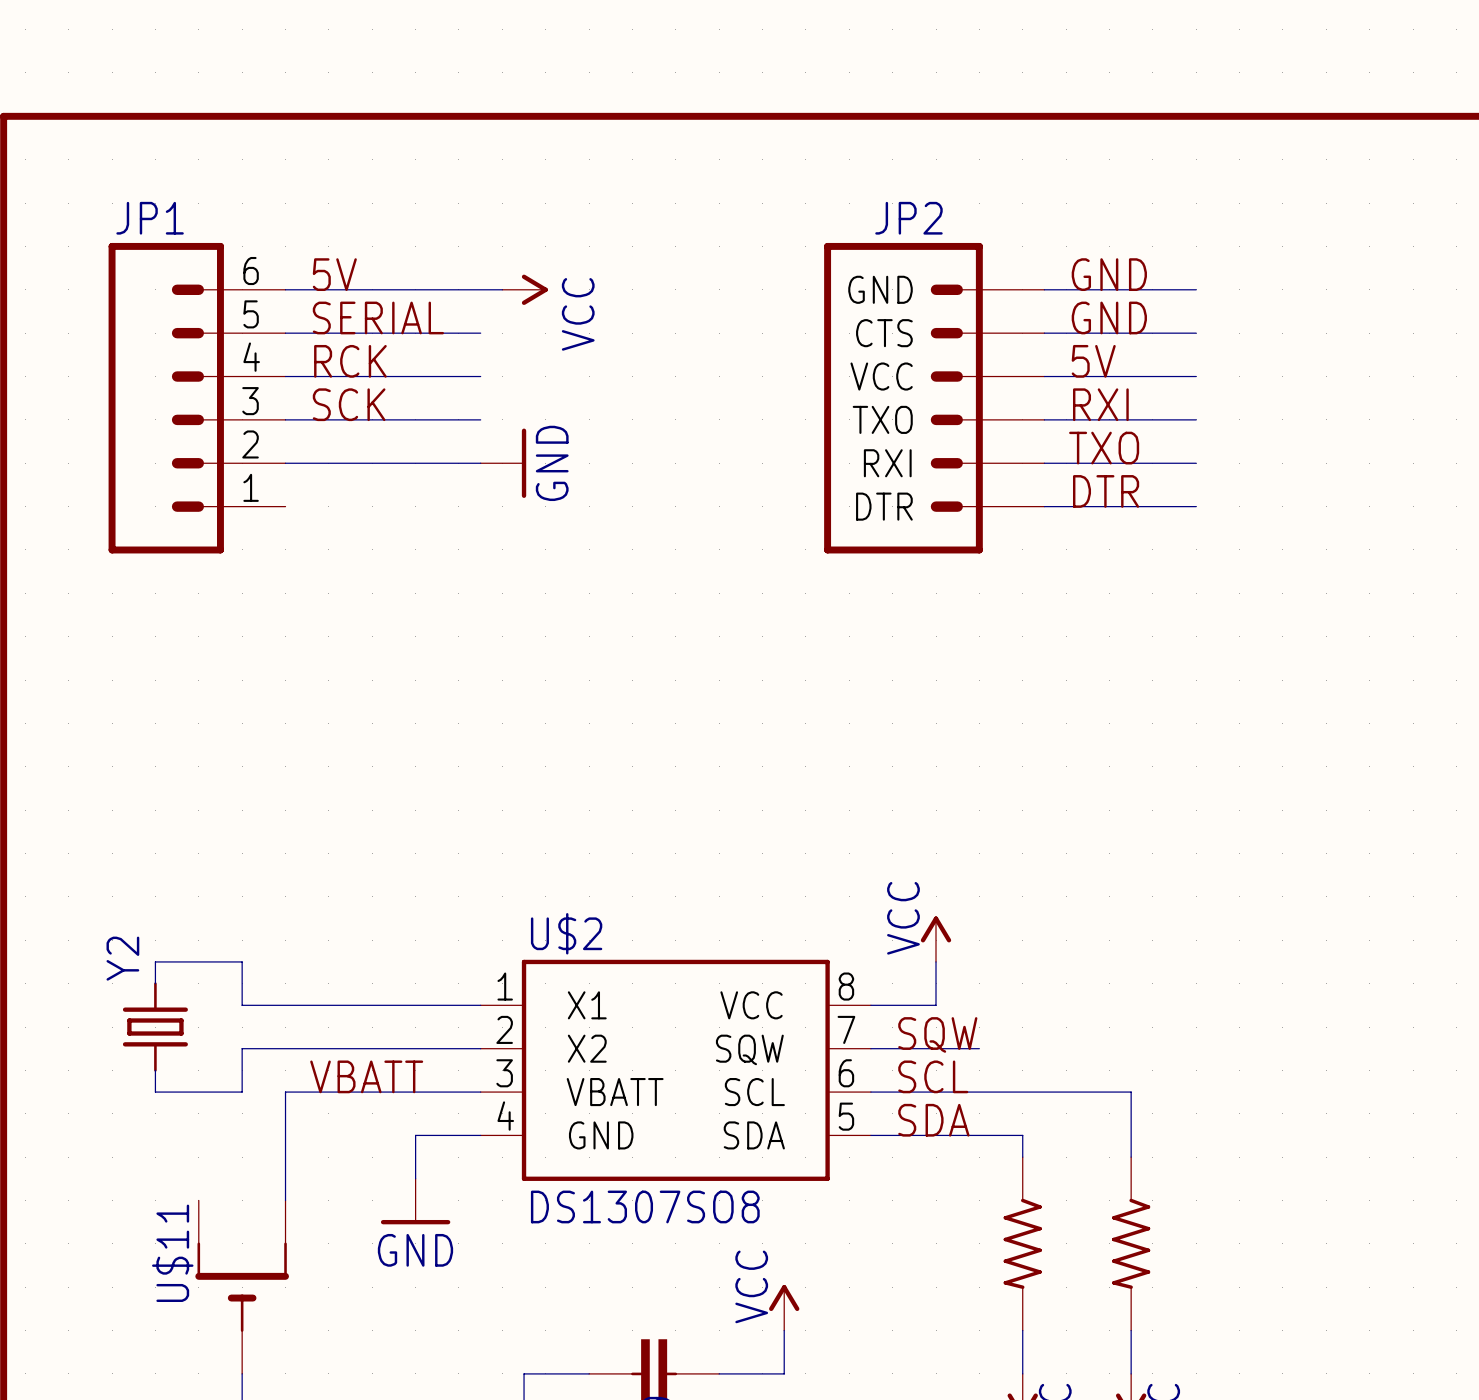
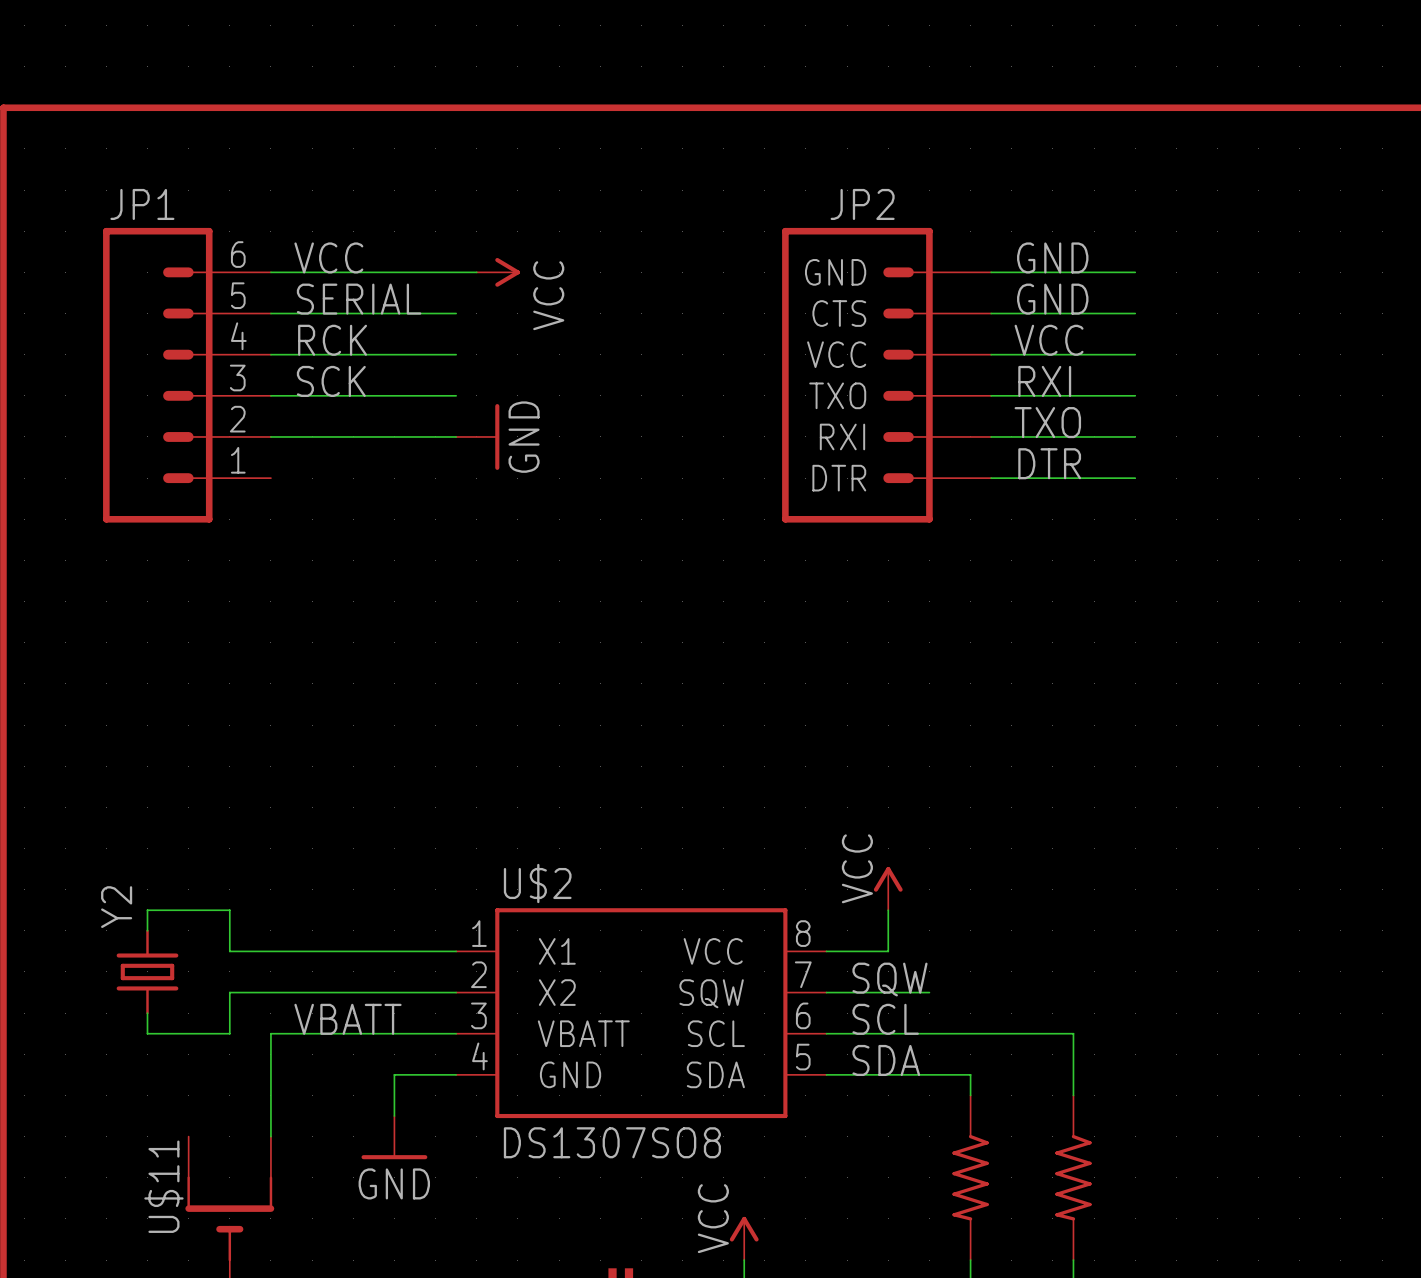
label: 5V (334, 274) -> VCC (328, 257)
label: 5V (1093, 361) -> VCC (1049, 340)

